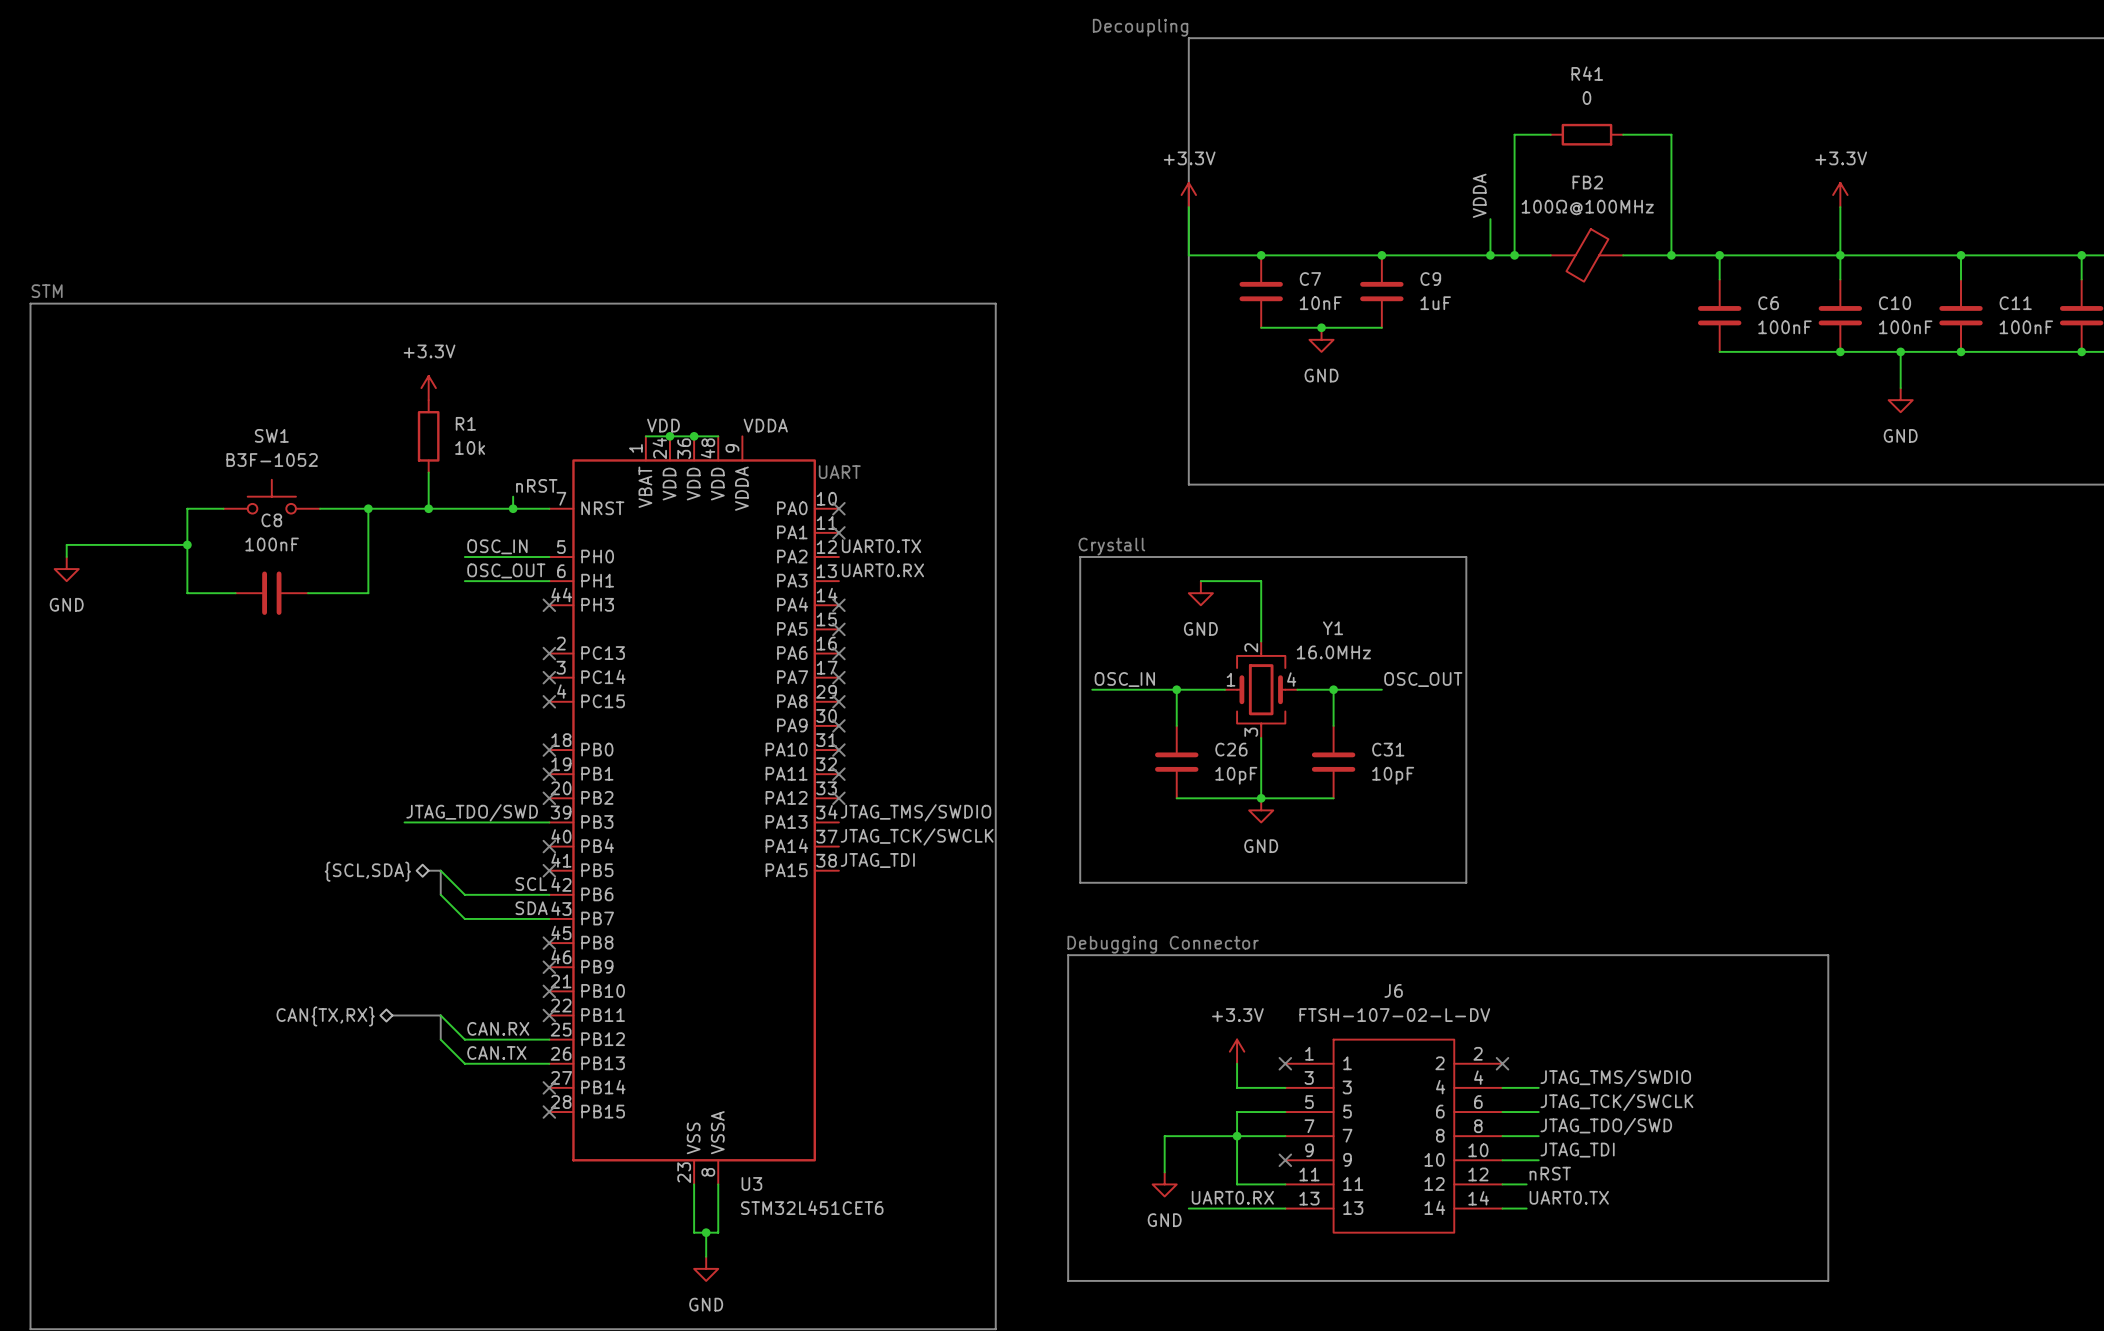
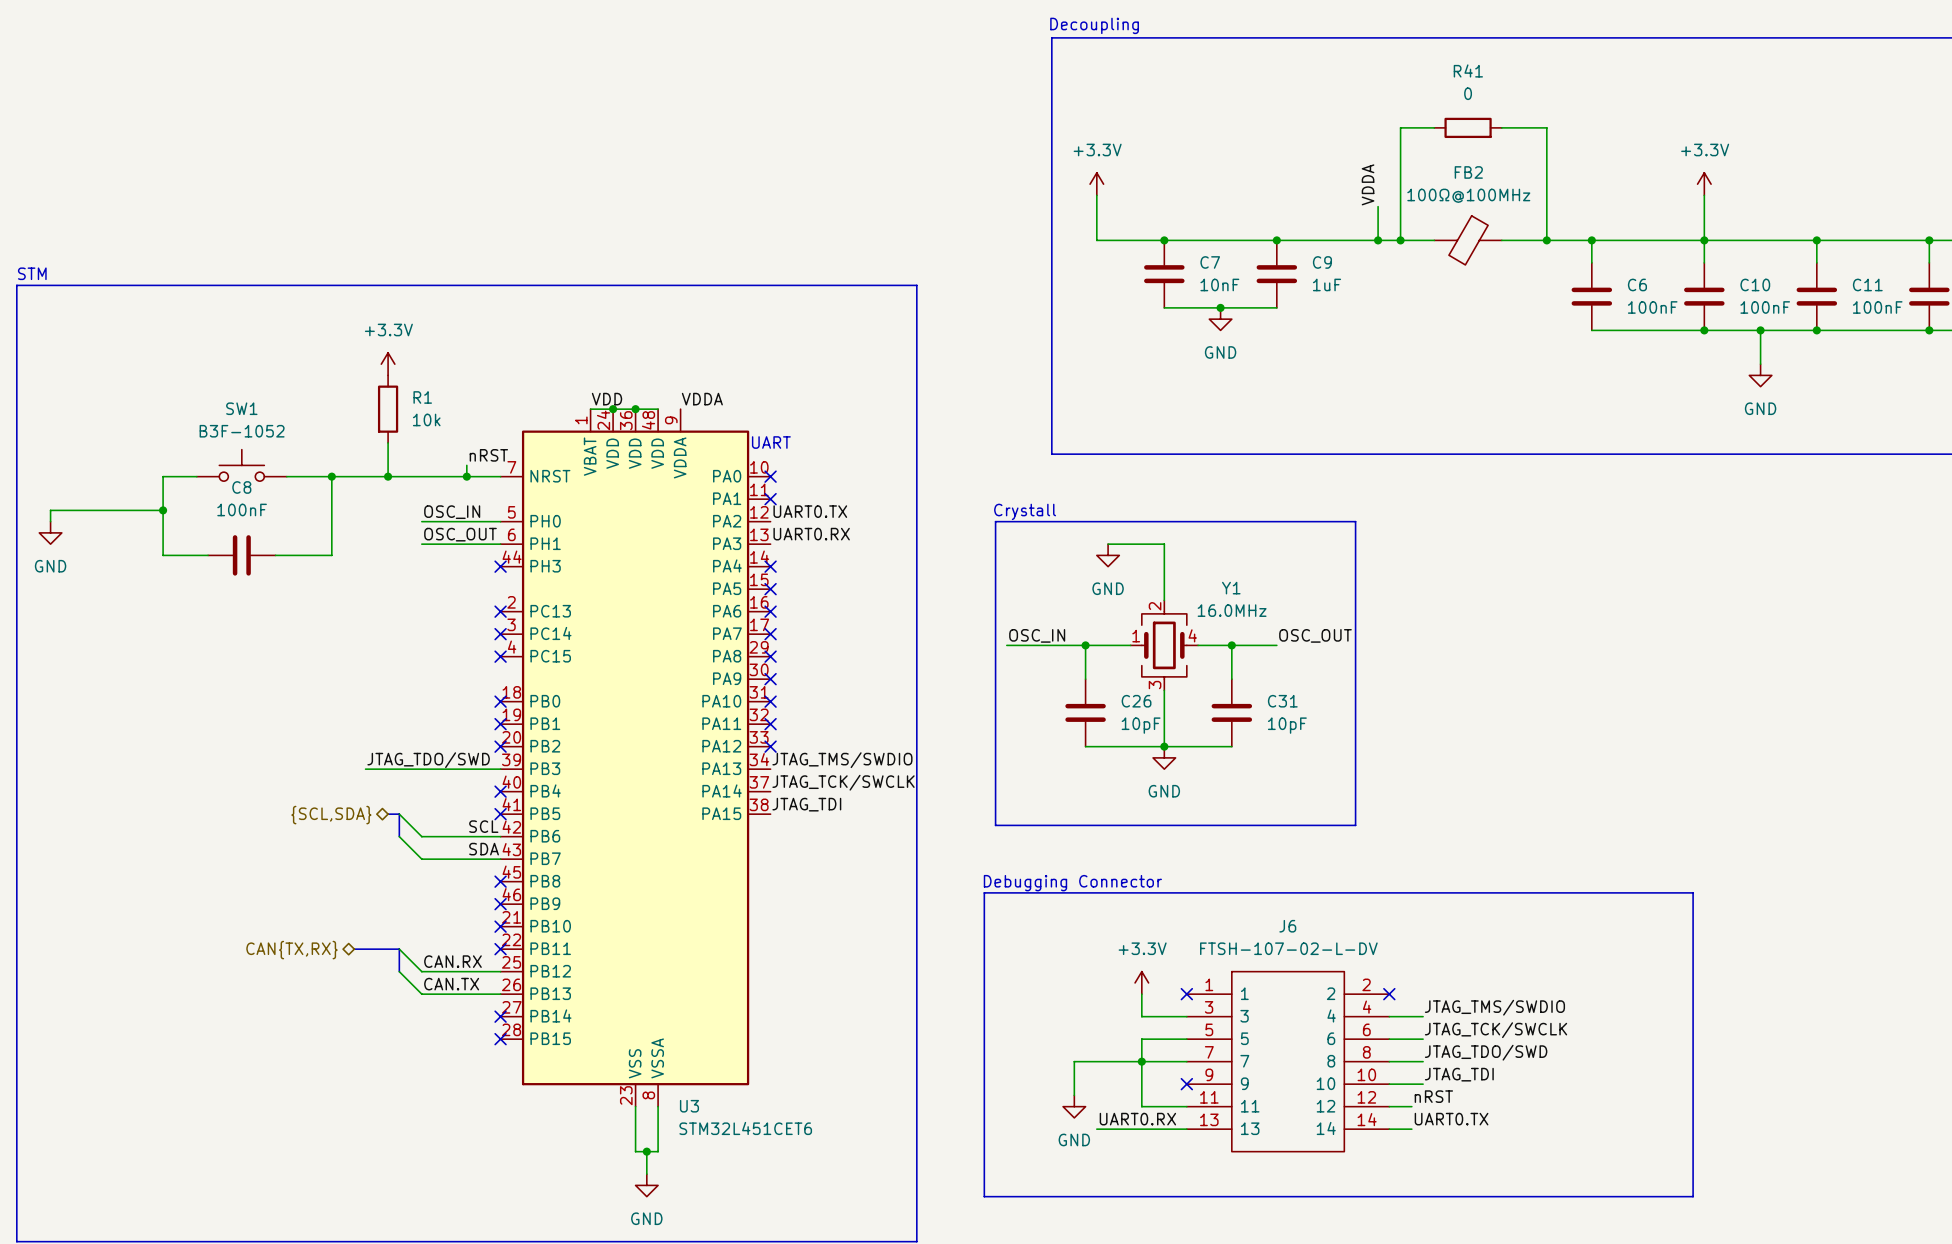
text position: Decoupling (1140, 27) -> Decoupling (1094, 25)
line: (1188, 38) (1188, 484) -> (1096, 37) (1051, 37) (1051, 454) (1096, 454)

